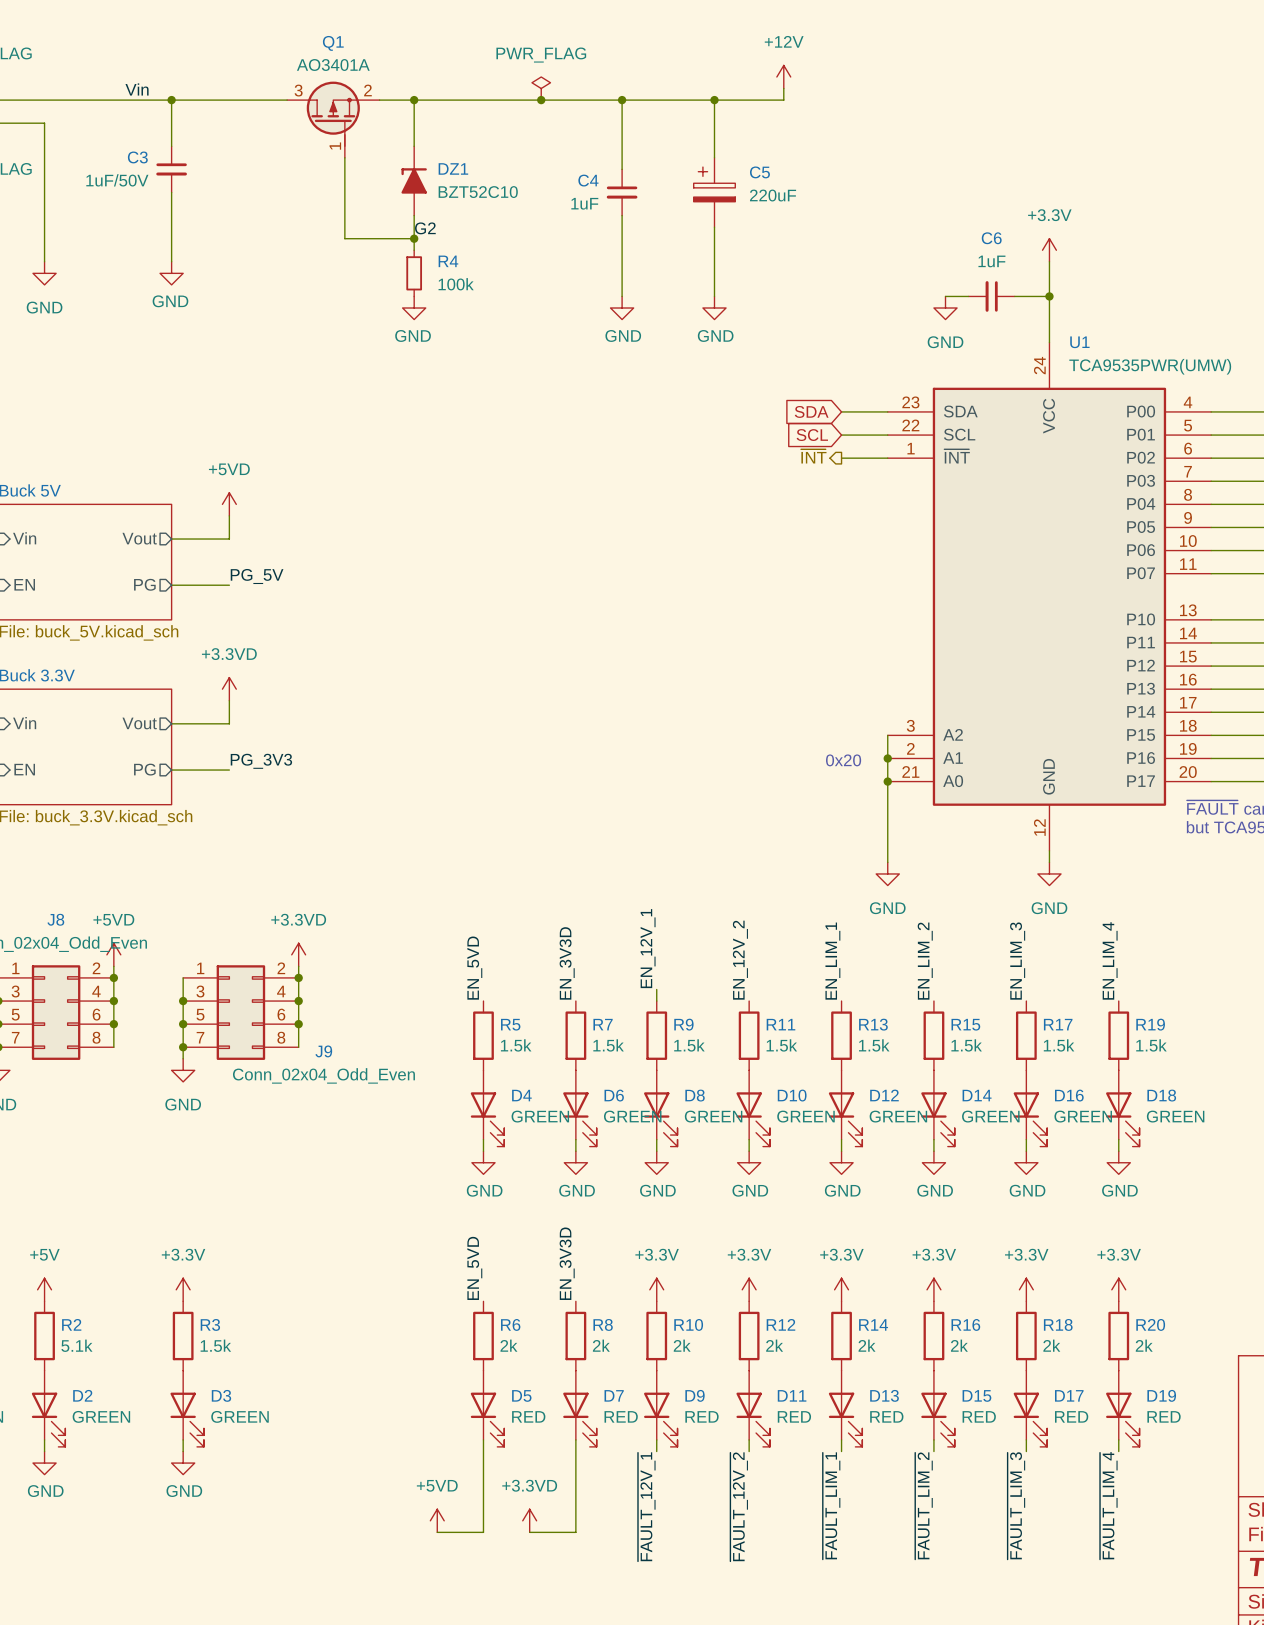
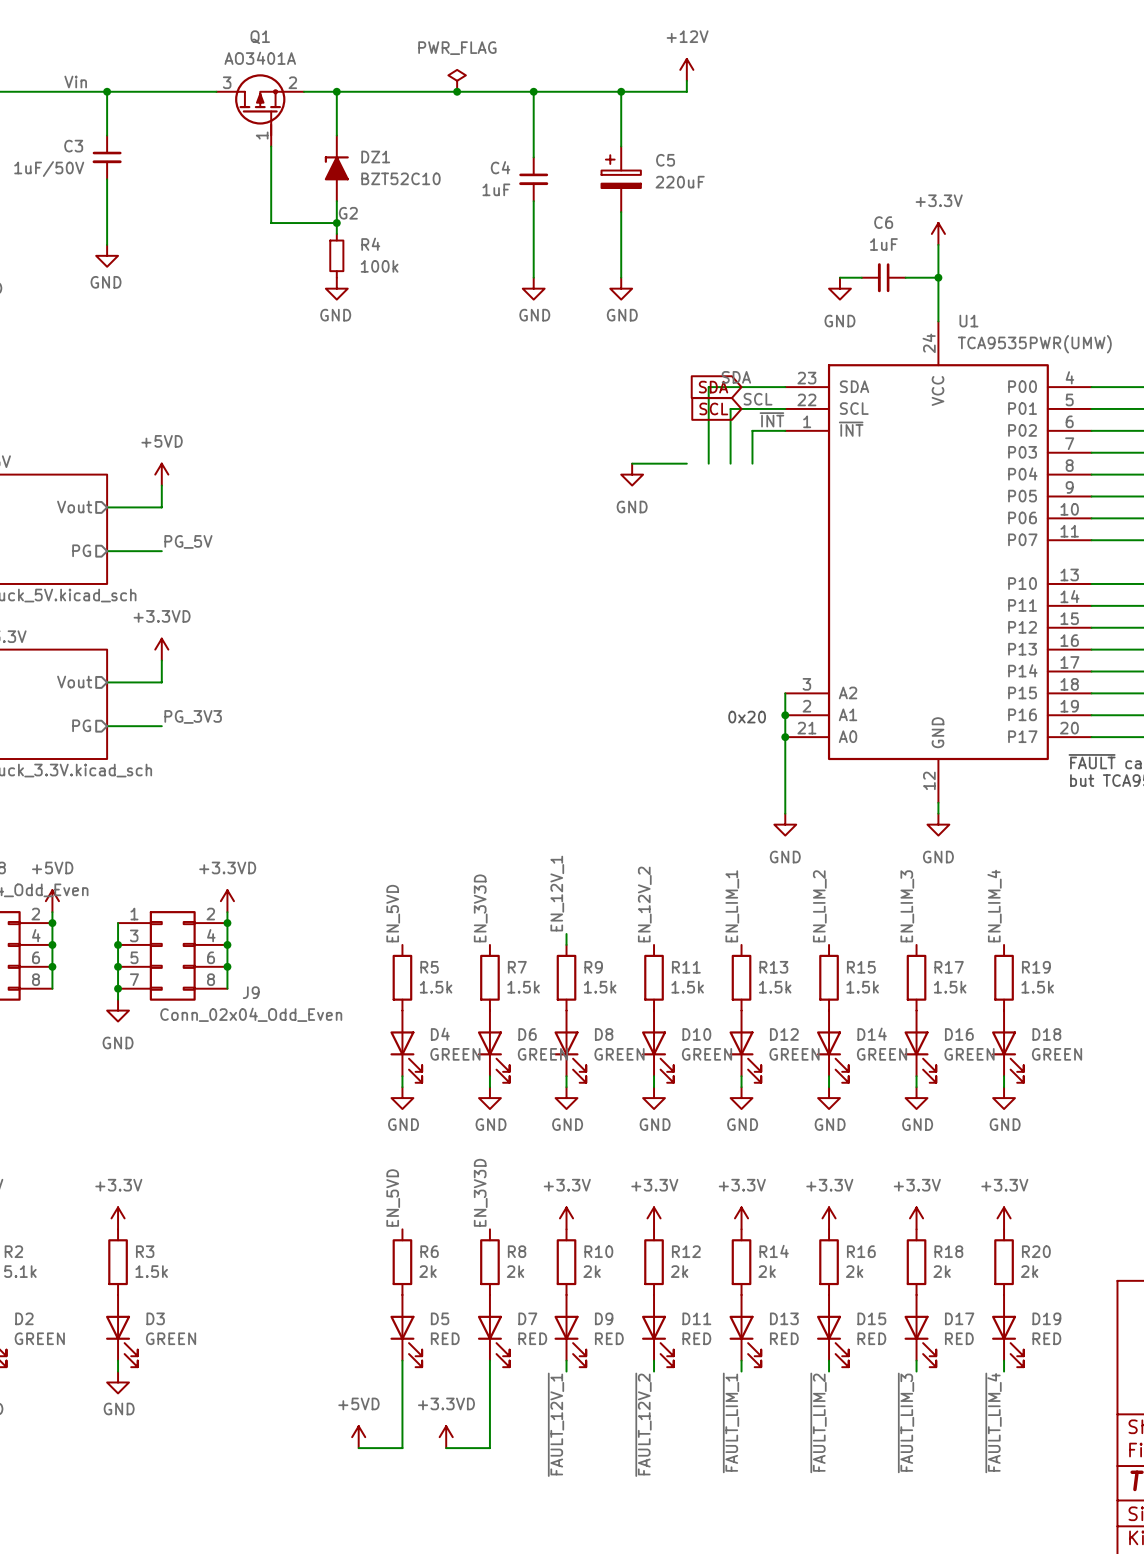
label: none -> SDA (736, 377)
wire: none -> (741, 387) (708, 387) (708, 463)
label: none -> SCL (758, 399)
wire: none -> (741, 408) (730, 408) (730, 463)
label: none -> ~{INT} (771, 419)
hierarchical label: ~{INT} (813, 456) -> none
wire: (841, 458) (853, 458) -> (752, 463) (752, 430)
wire: none -> (632, 463) (686, 463)
power symbol: none -> GND (632, 474)

